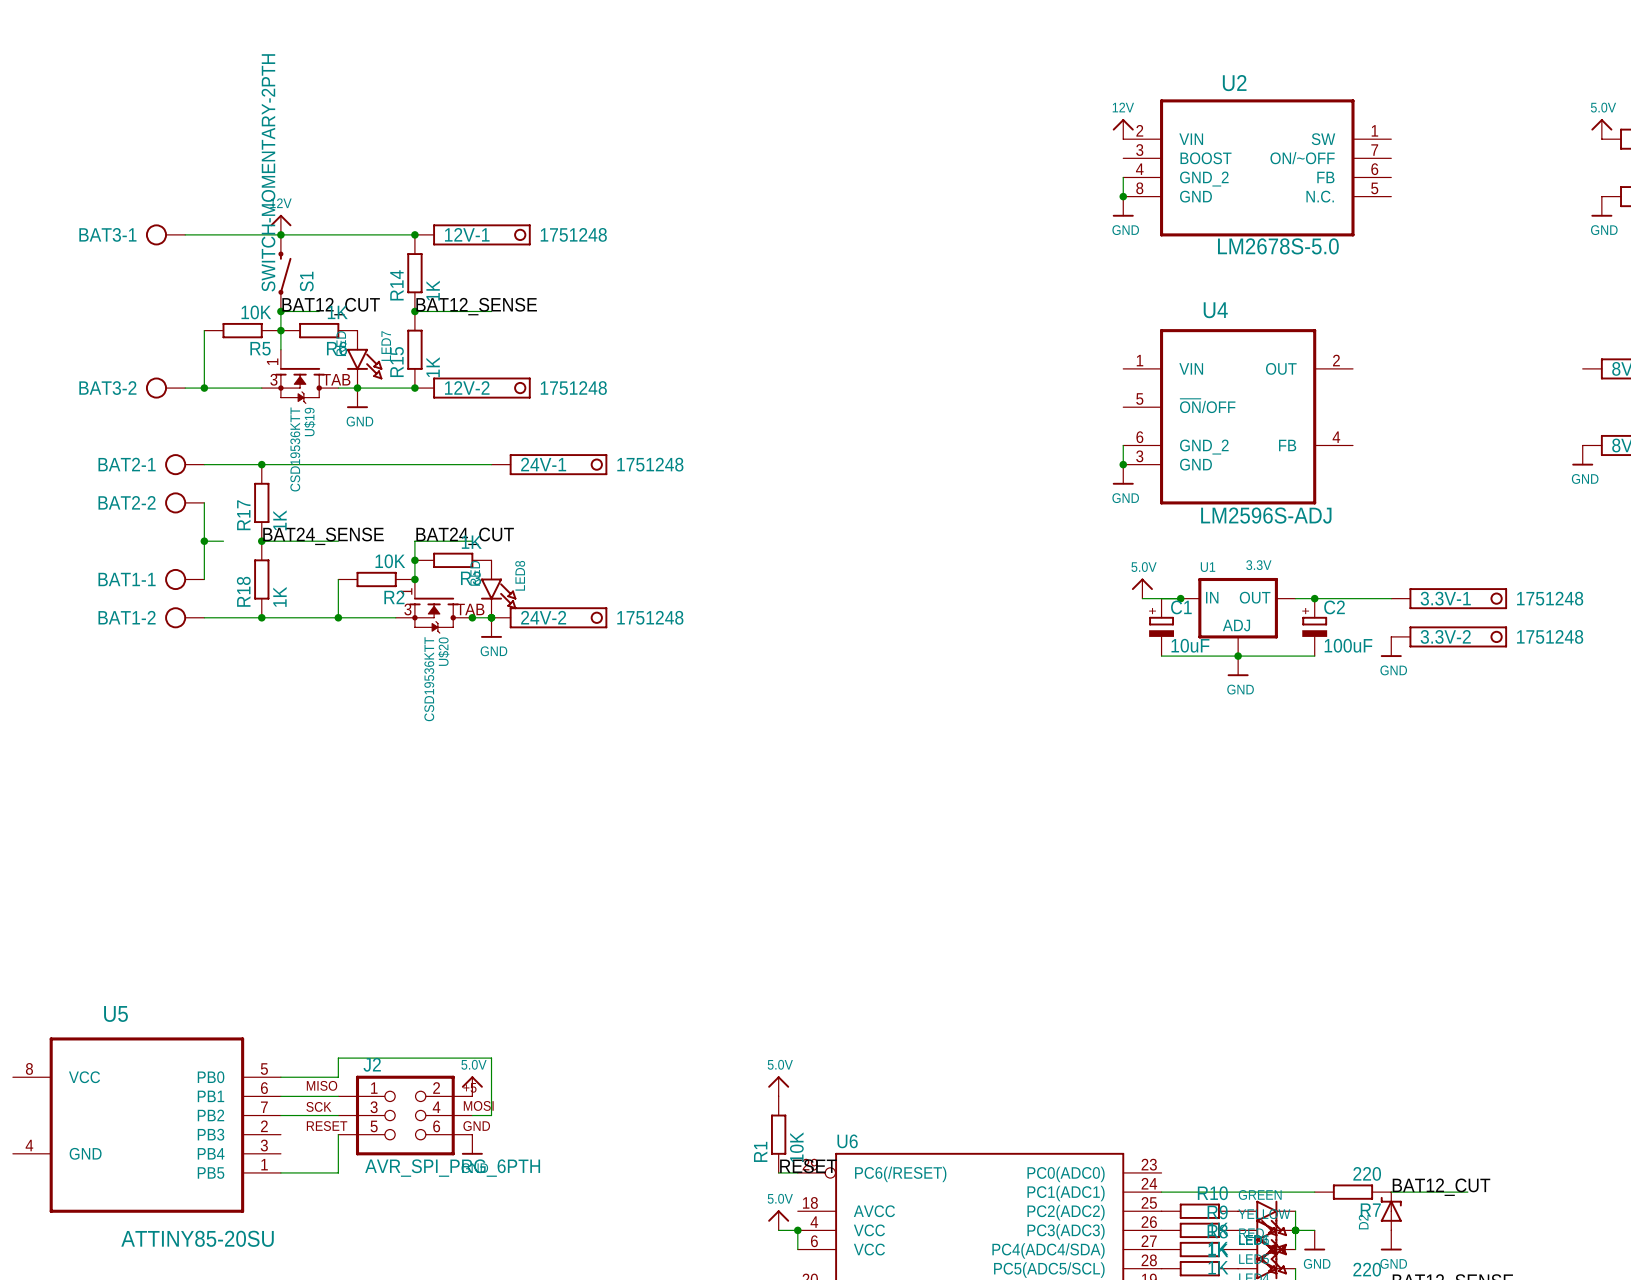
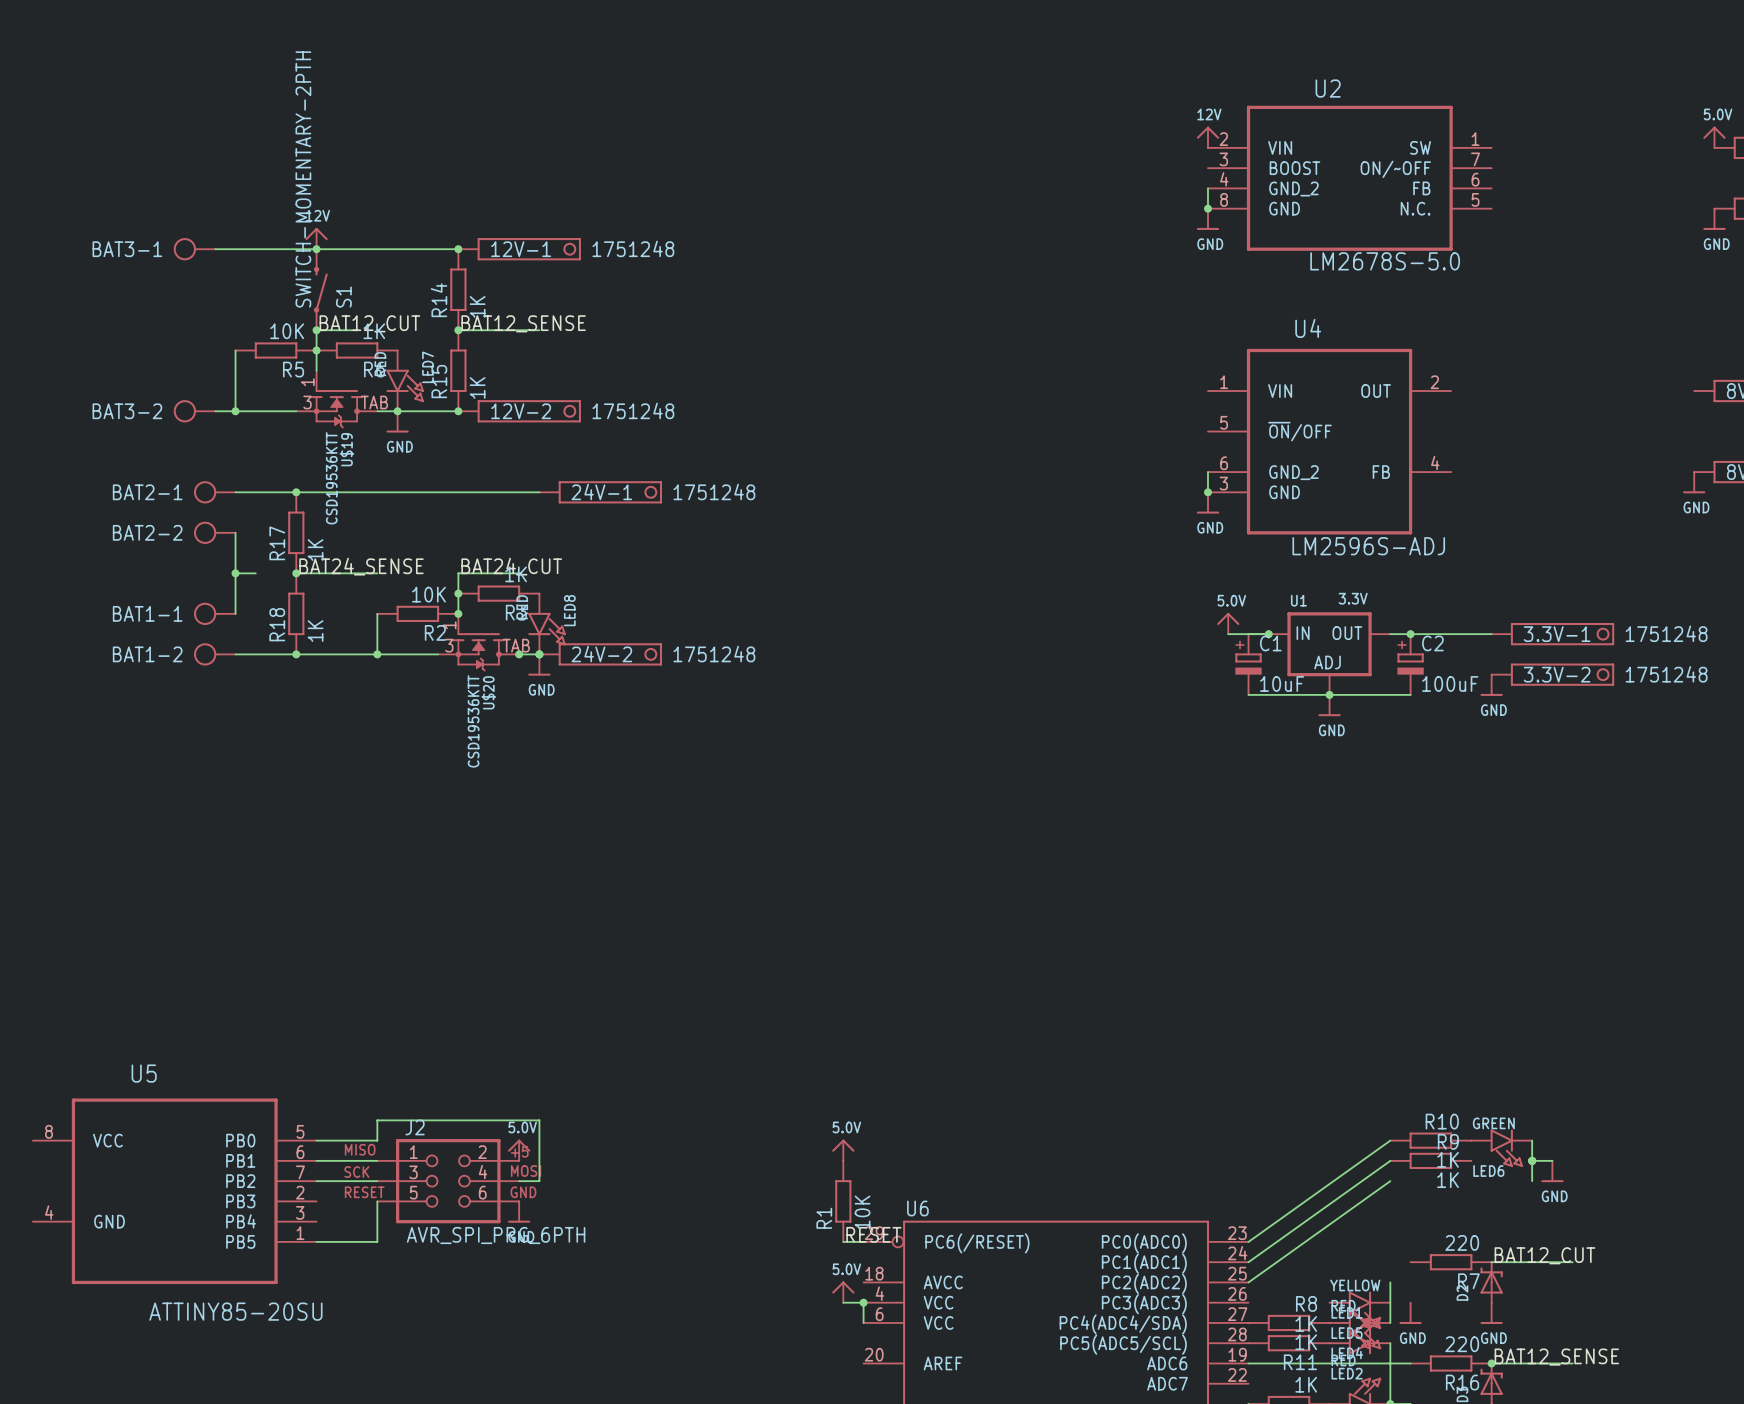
wire: none -> (1390, 1140) (1248, 1241)
wire: none -> (1532, 1140) (1532, 1181)
wire: none -> (1532, 1160) (1552, 1160)
junction: none -> (1532, 1160)
power symbol: none -> GND (1552, 1171)
wire: none -> (1390, 1181) (1248, 1282)
wire: (1161, 1192) (1314, 1192) -> (1248, 1262) (1390, 1160)
R10 position: (1199, 1211) -> (1430, 1140)
LED6 position: (1266, 1218) -> (1501, 1148)
R9 position: (1199, 1230) -> (1430, 1160)
wire: (1295, 1230) (1314, 1230) -> none
junction: (1295, 1230) -> none

